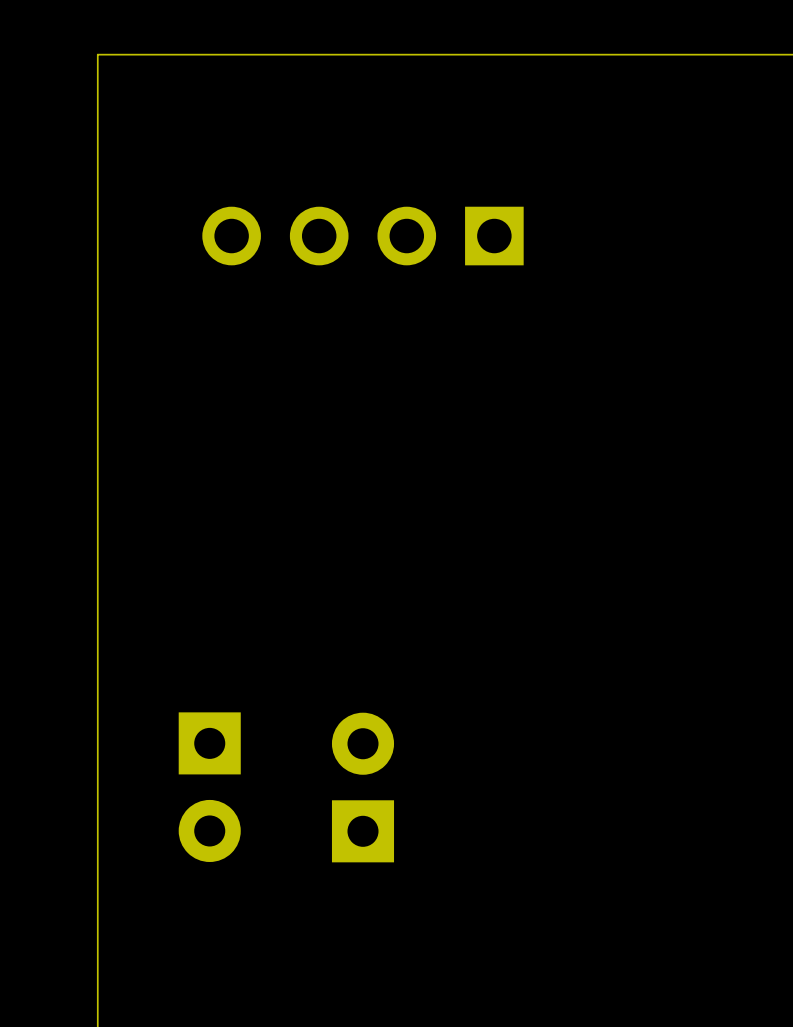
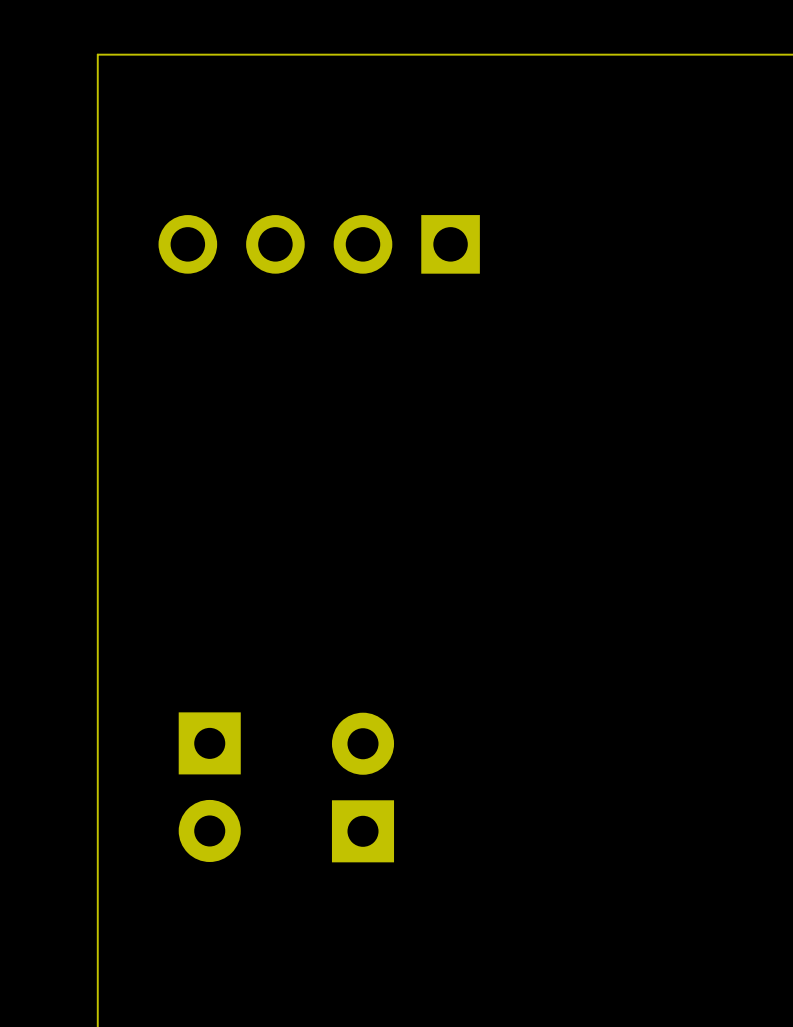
part position: (362, 236) -> (319, 244)

